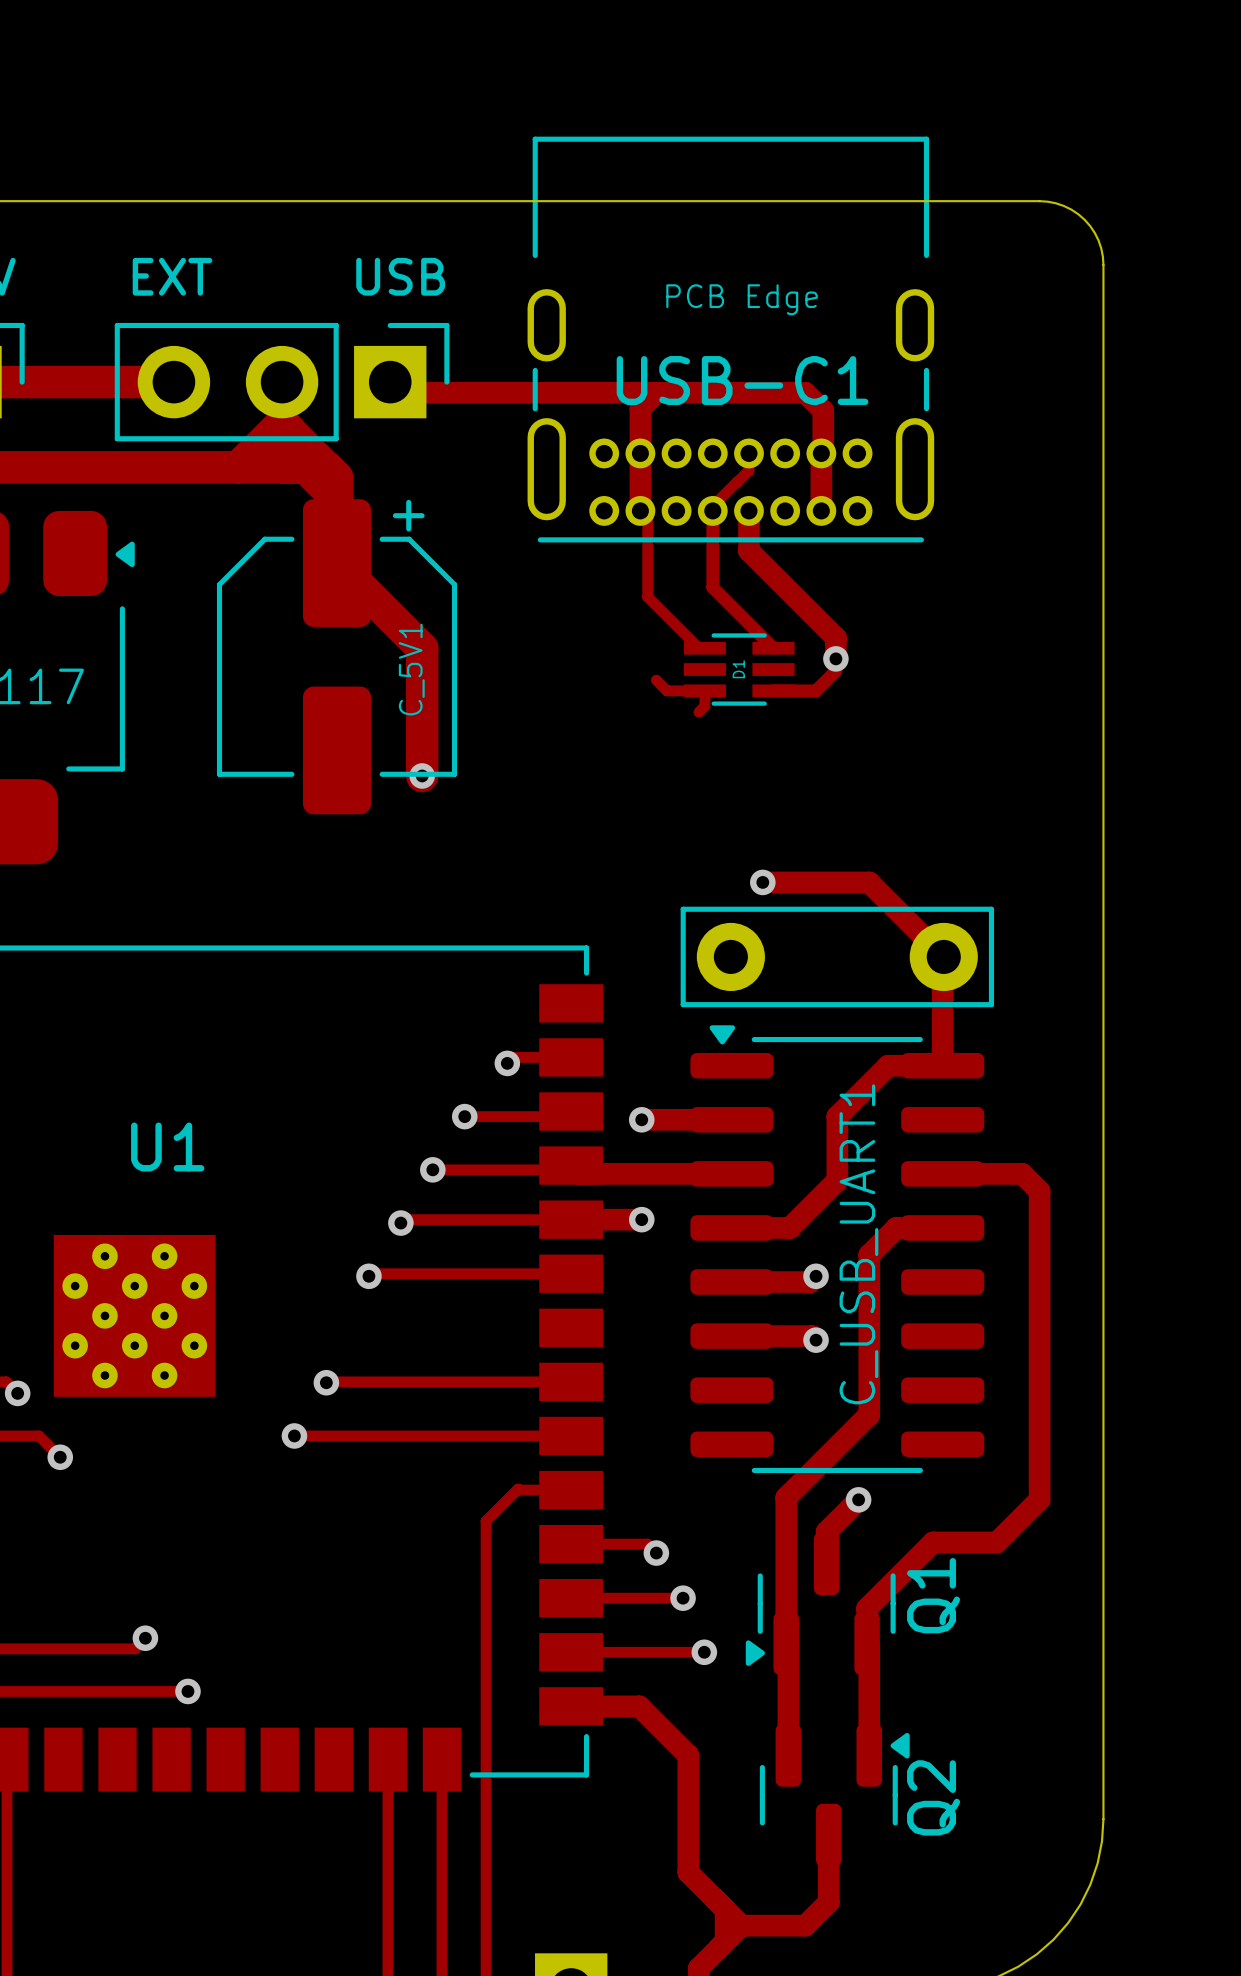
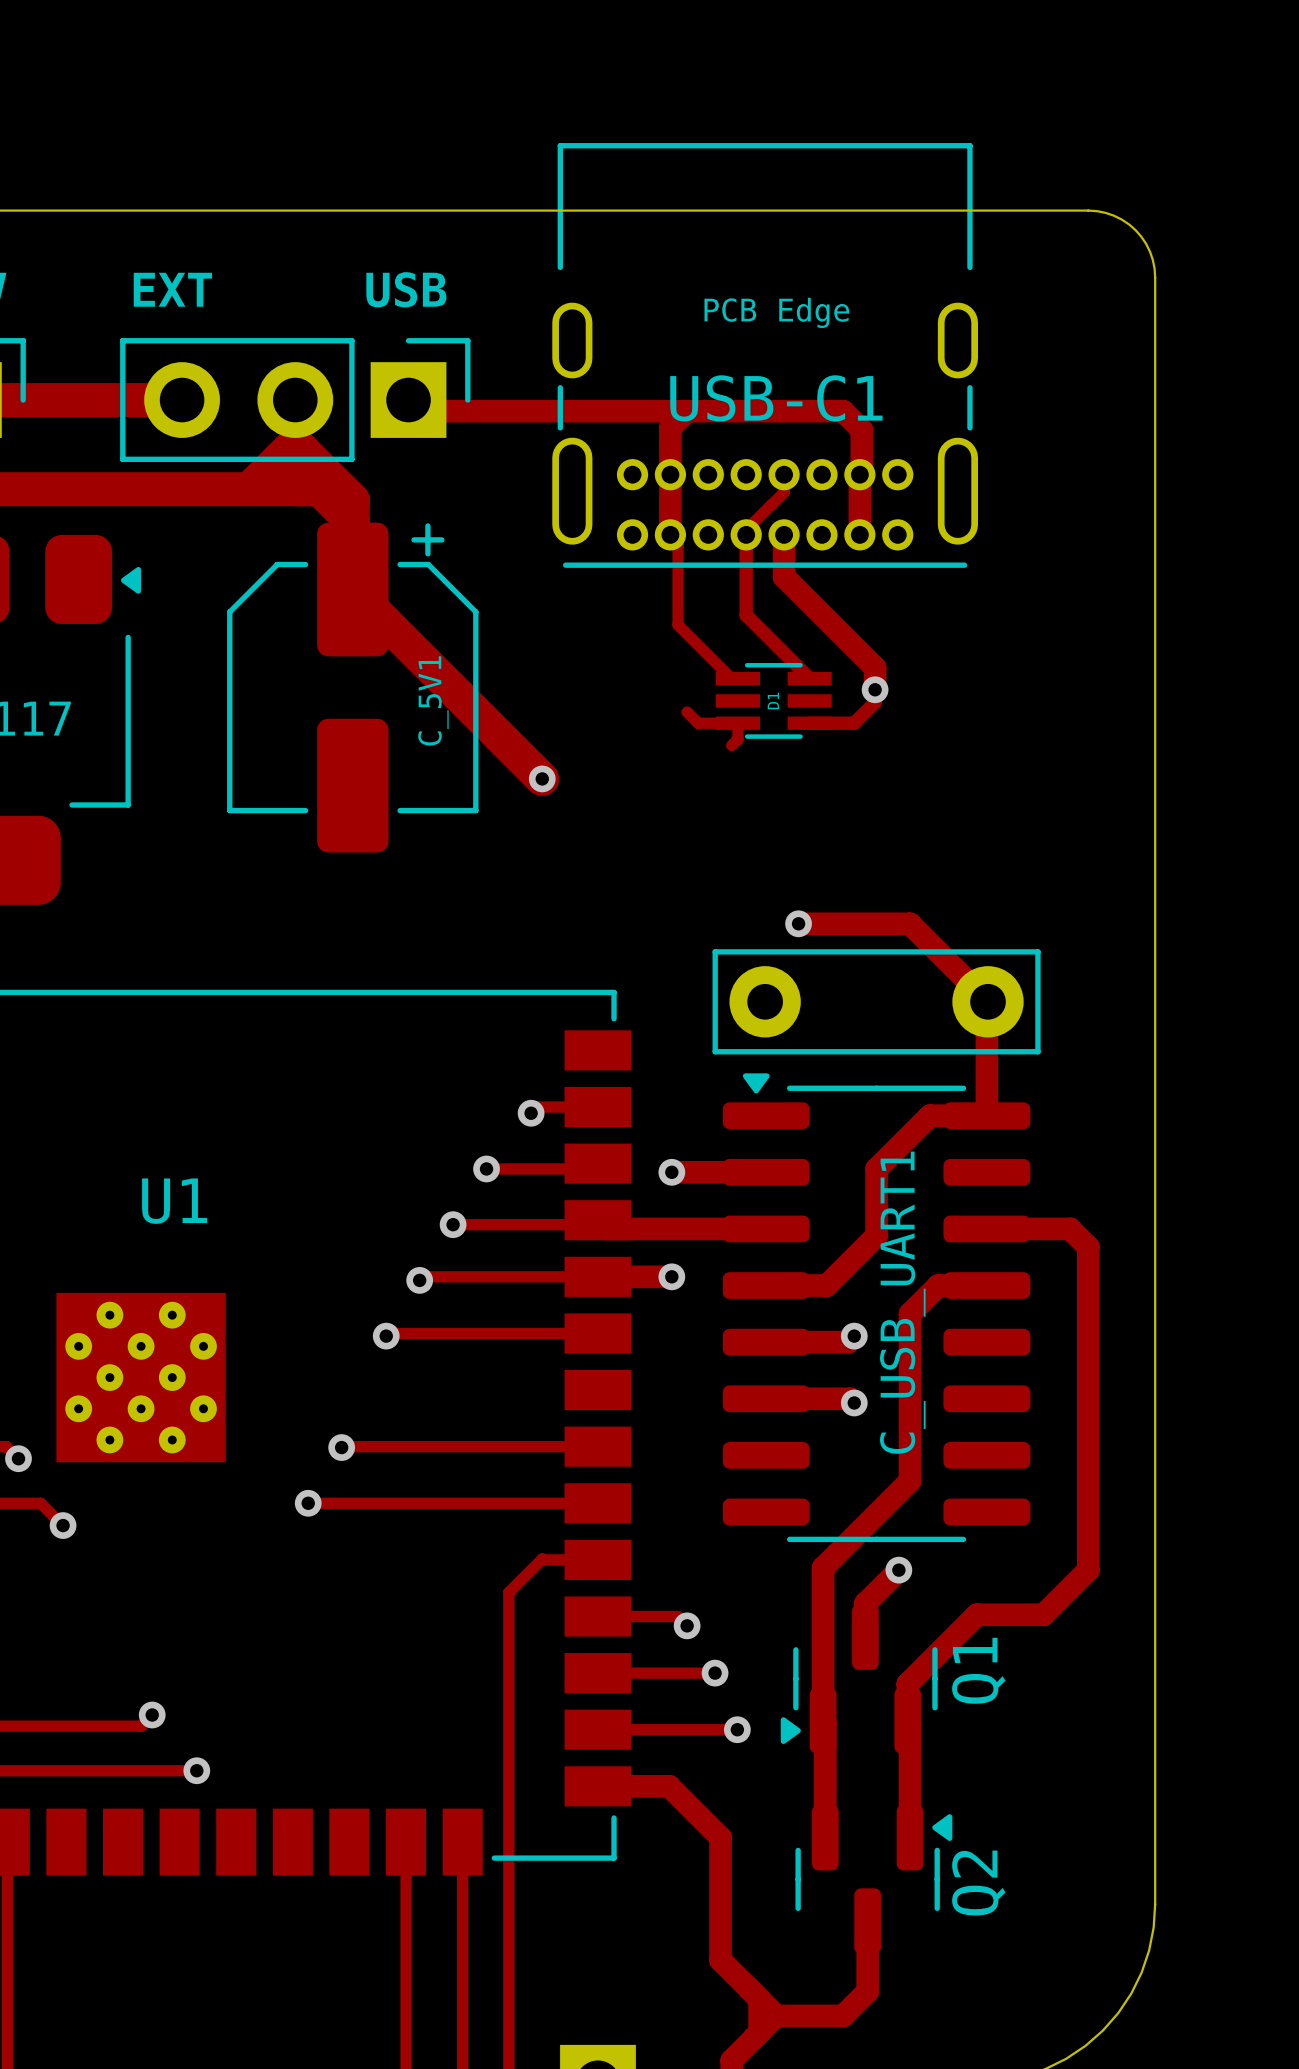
track: (422, 648) (422, 775) -> (441, 678) (542, 778)
via position: (422, 775) -> (542, 778)

